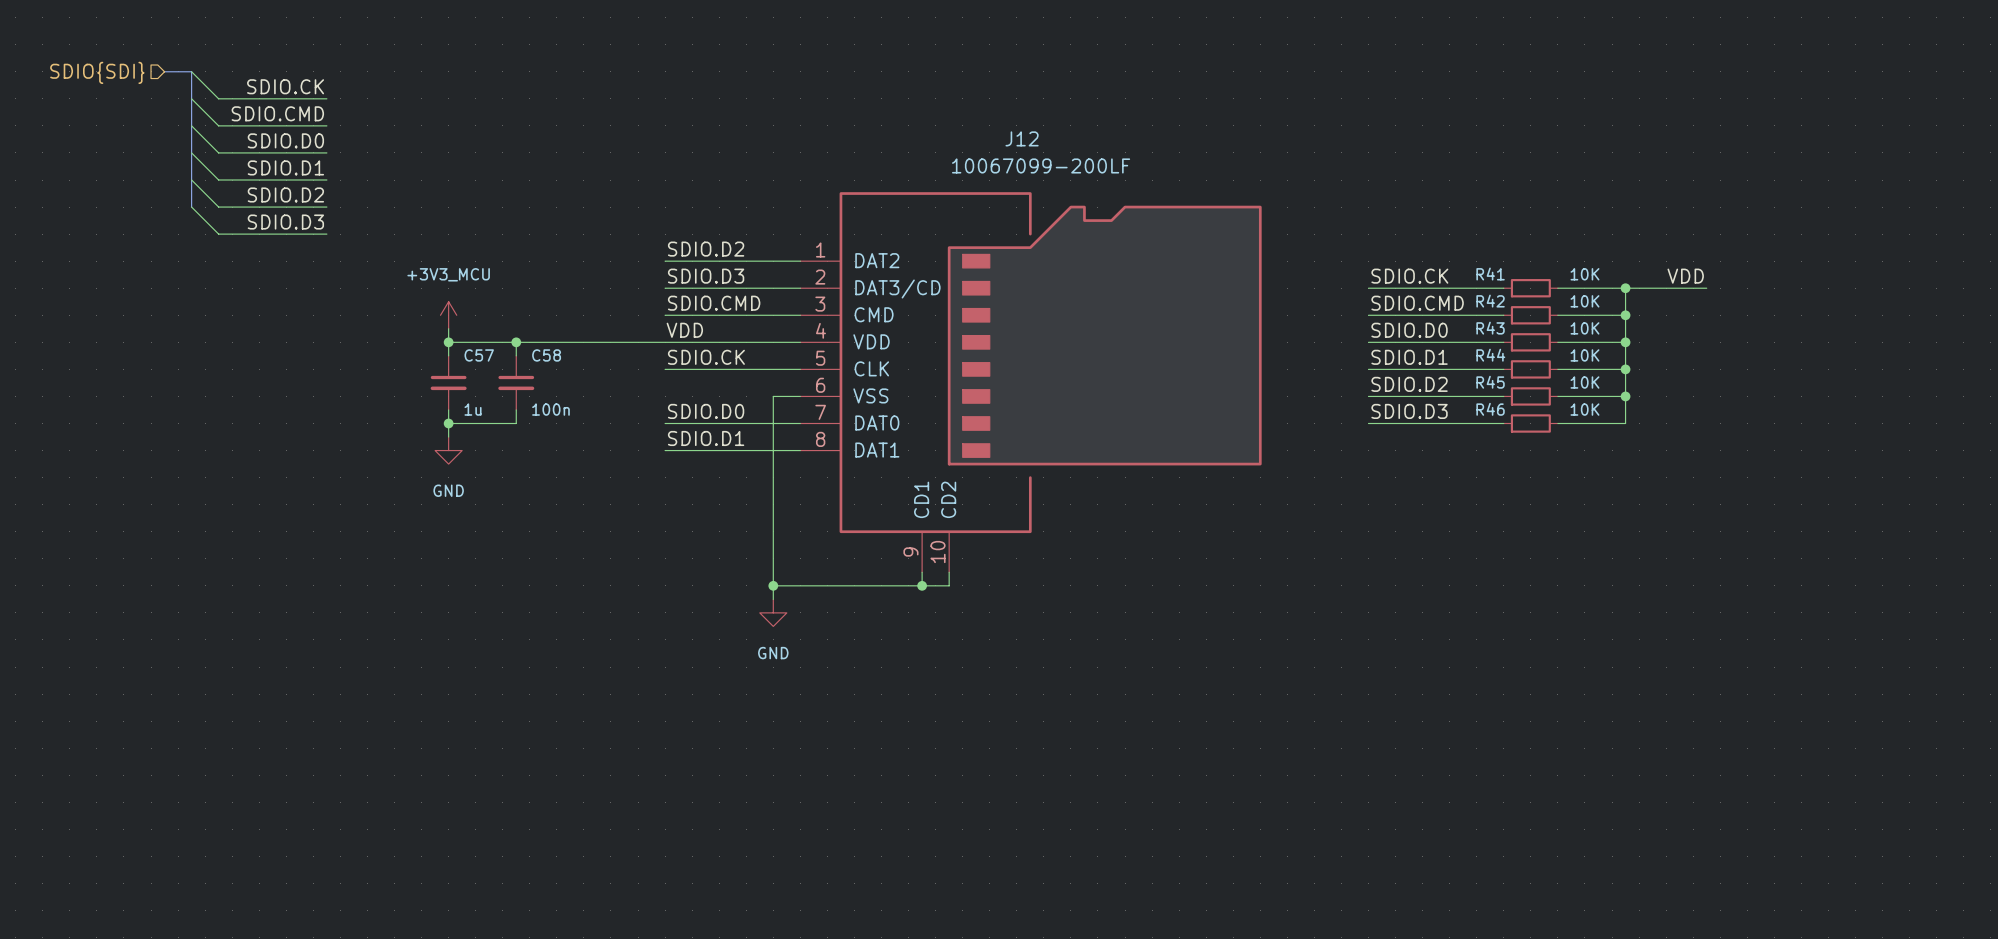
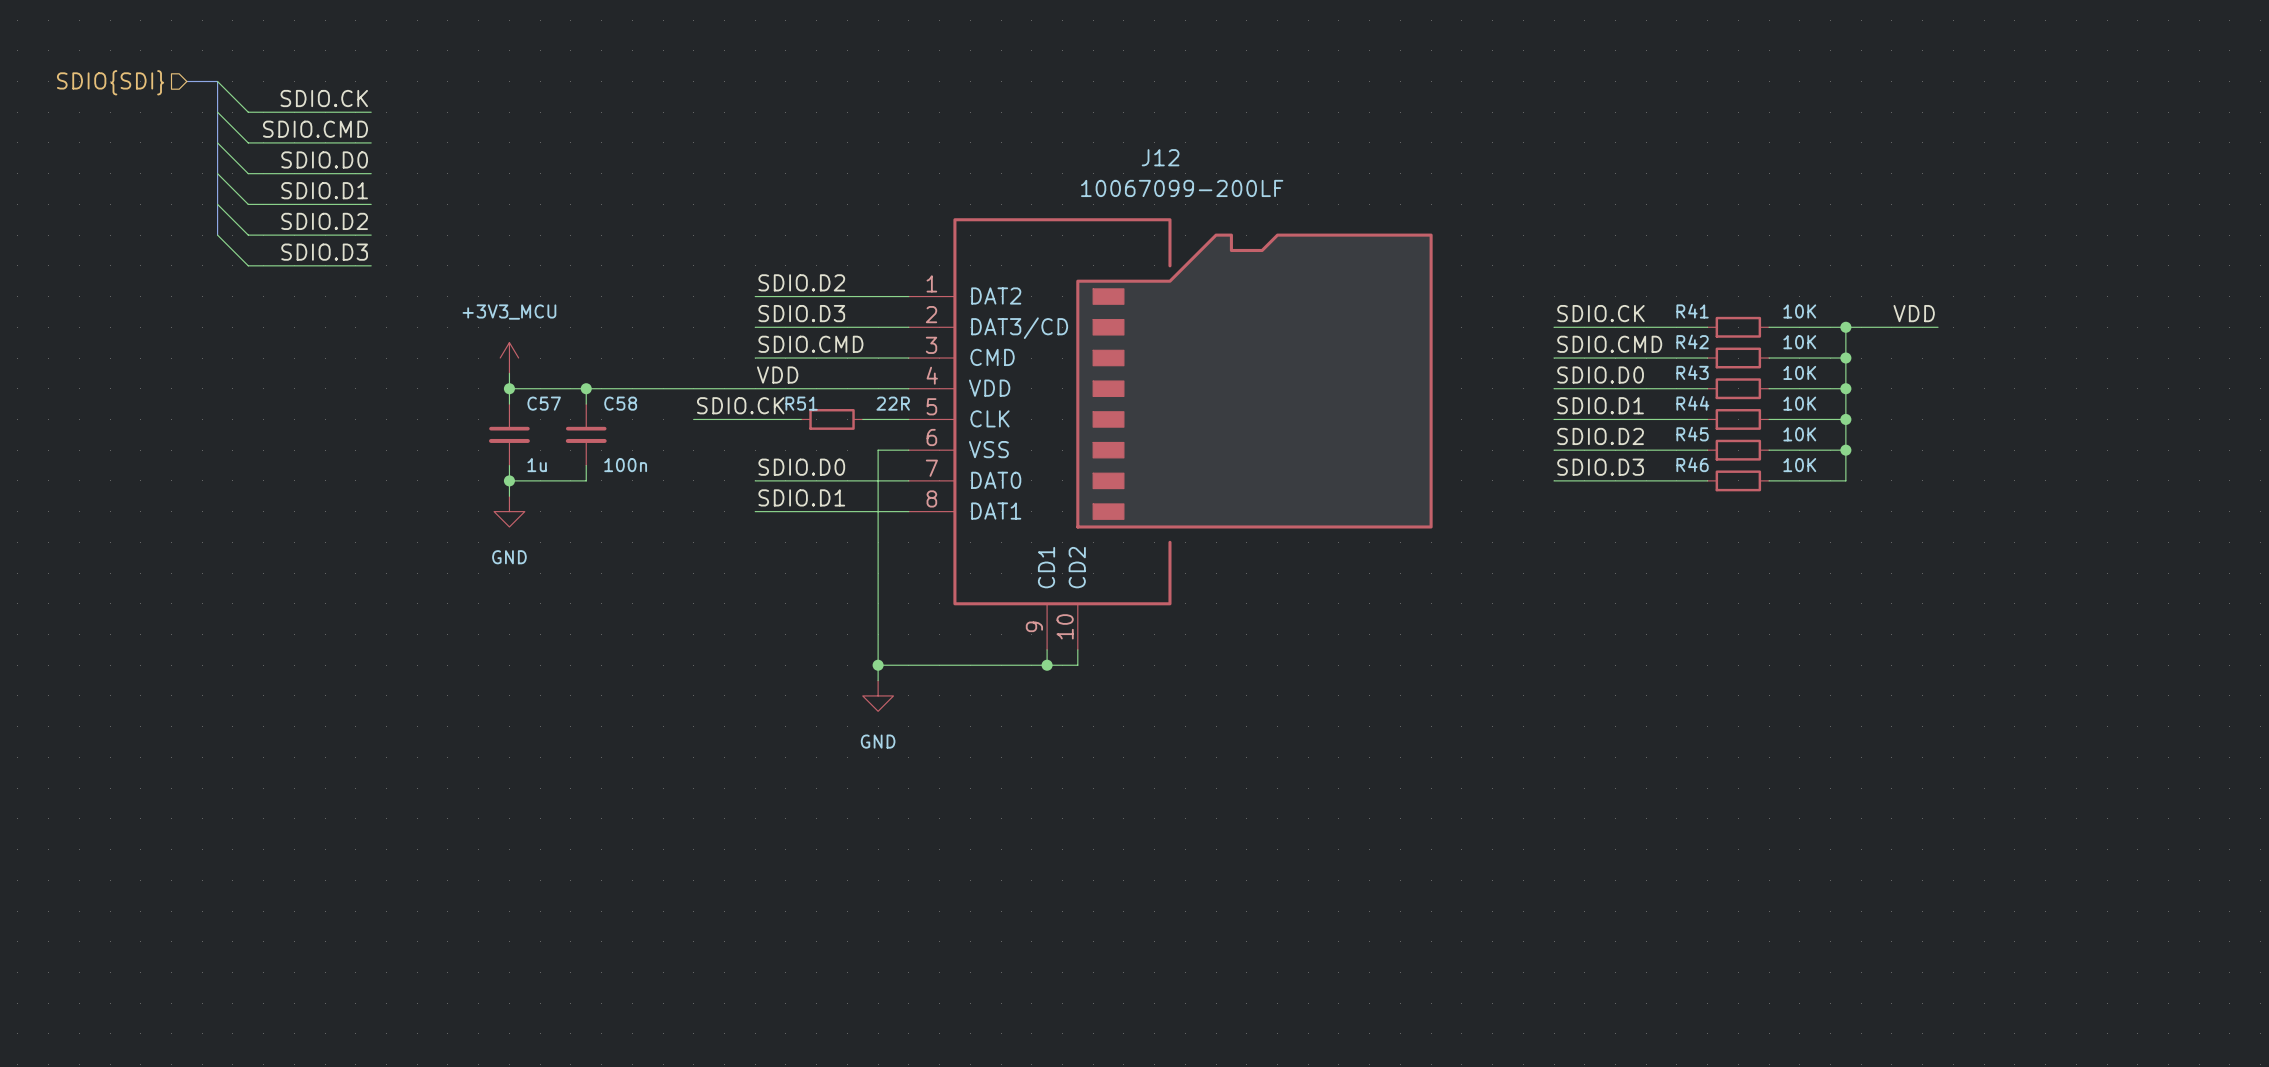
label position: SDIO.CK (706, 357) -> SDIO.CK (740, 405)
wire: (705, 369) (759, 369) -> (693, 419) (755, 419)
R51: none -> 22R (832, 419)

